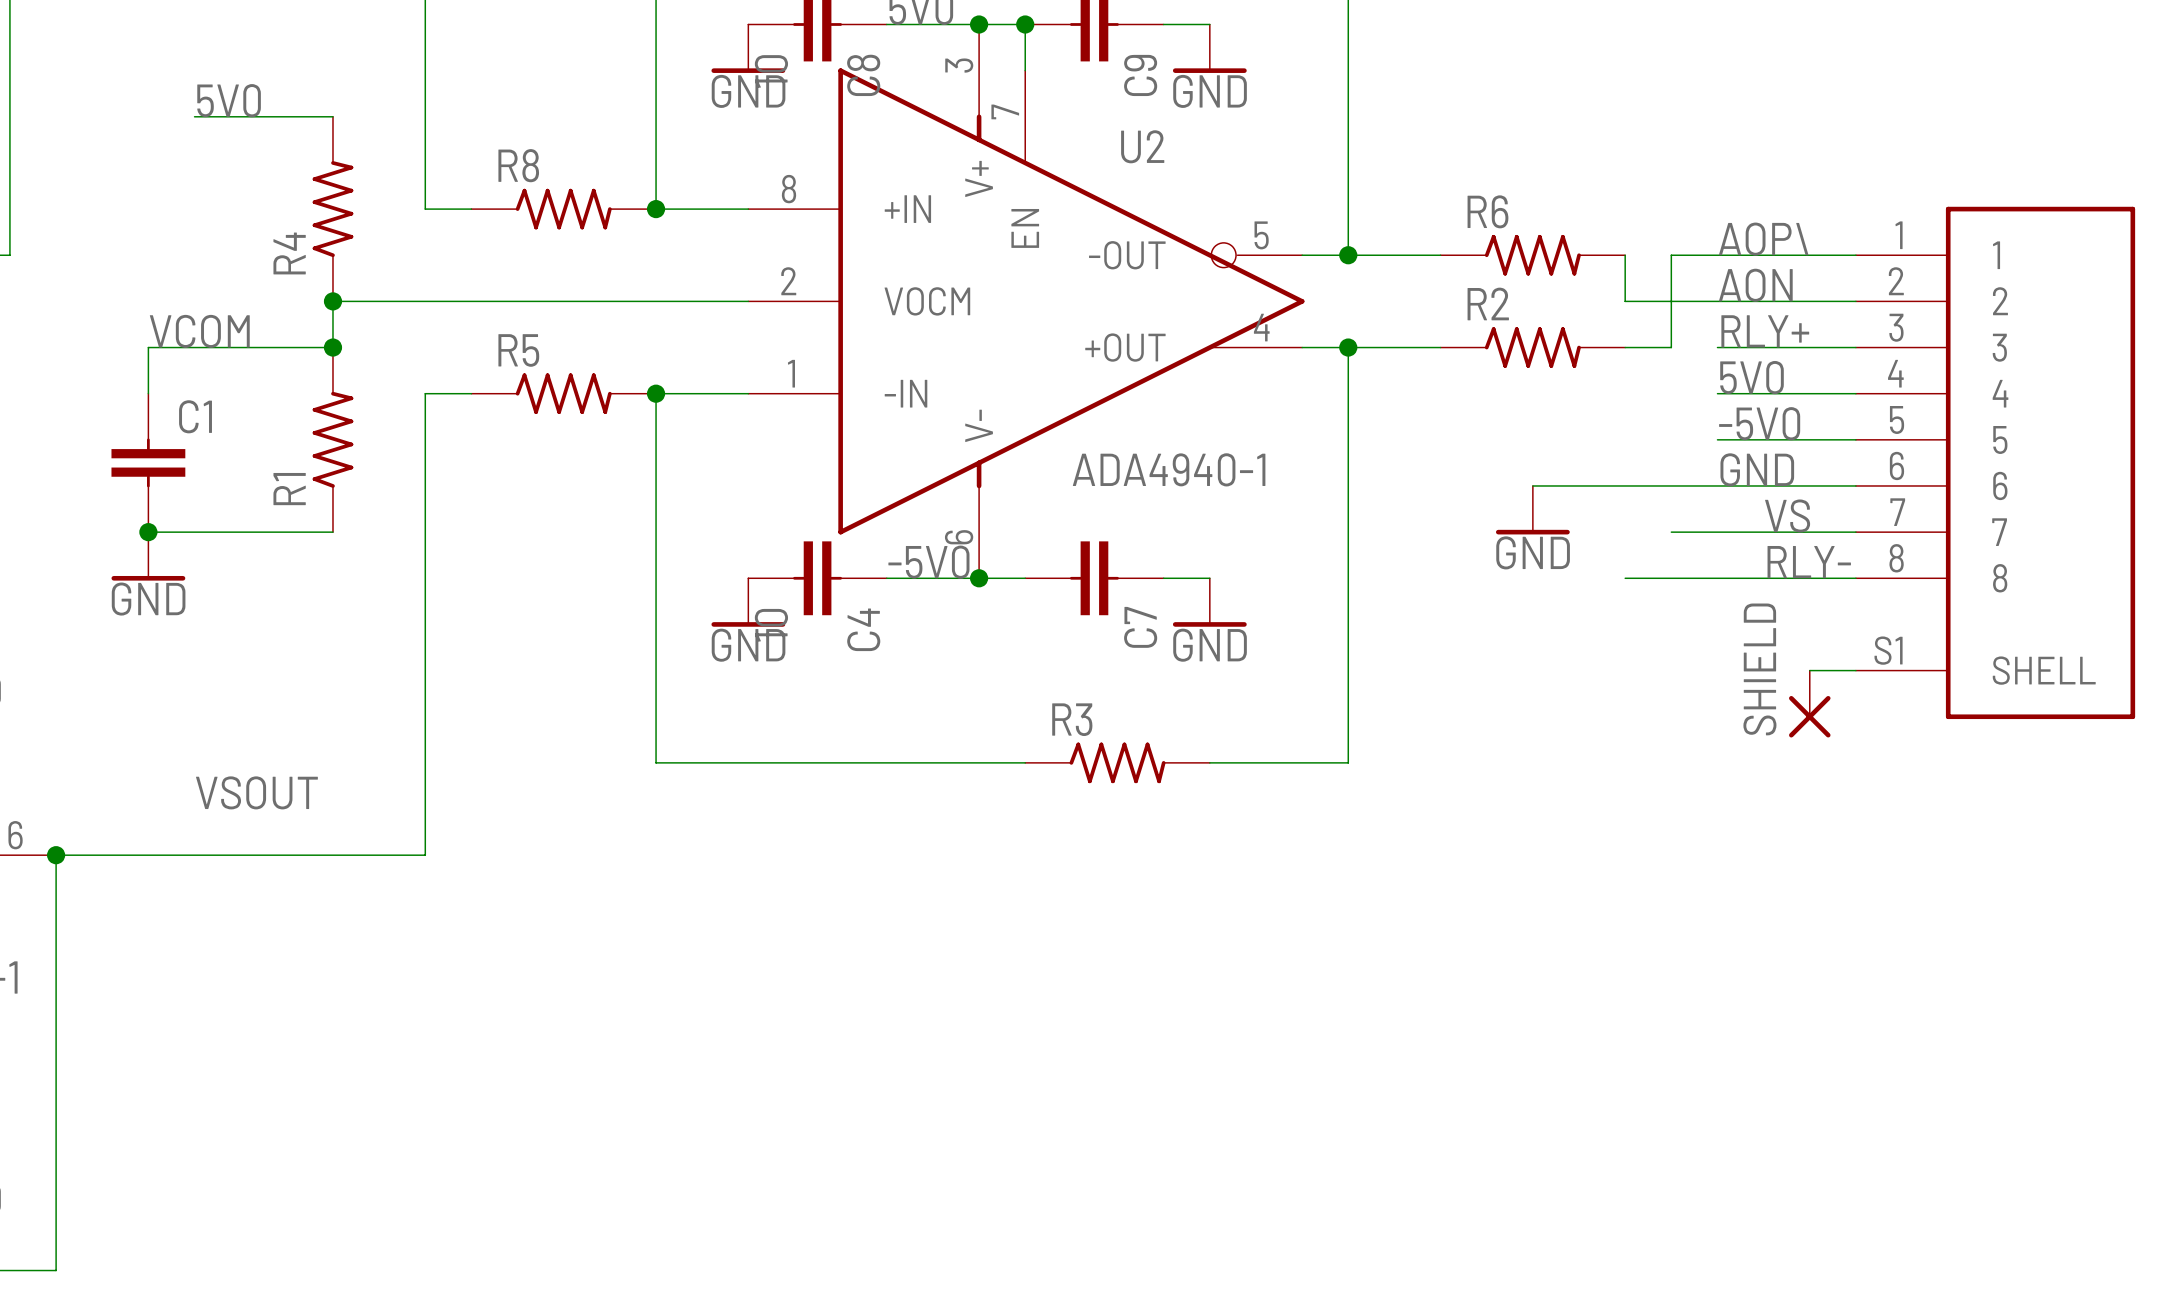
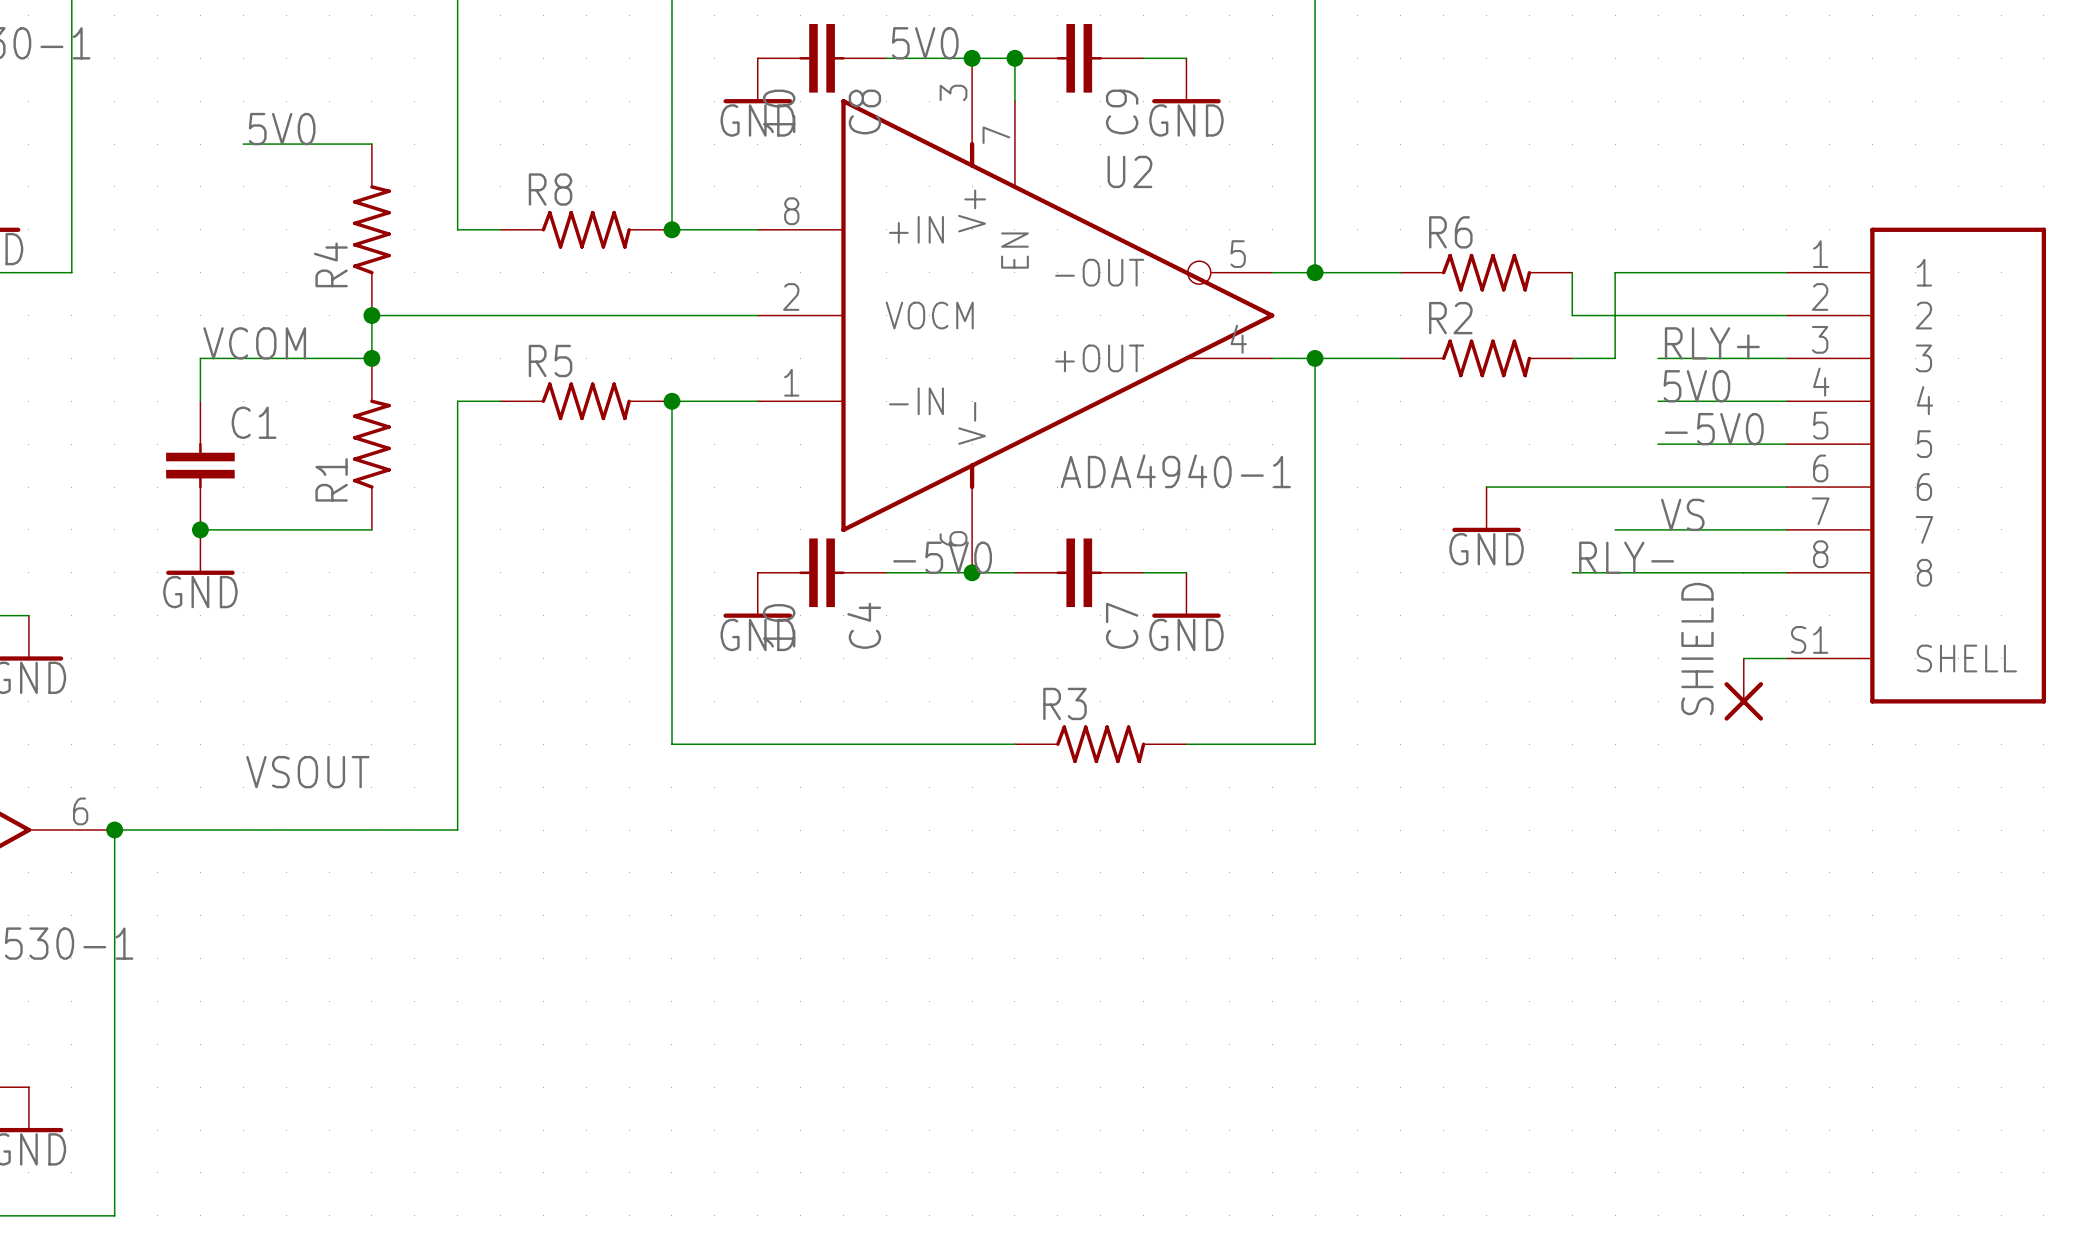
label: AOP\ (1763, 239) -> none
label: AON (1755, 285) -> none
label: GND (1757, 469) -> none
label position: VS (1787, 515) -> VS (1682, 514)
label position: RLY- (1809, 562) -> RLY- (1626, 557)

